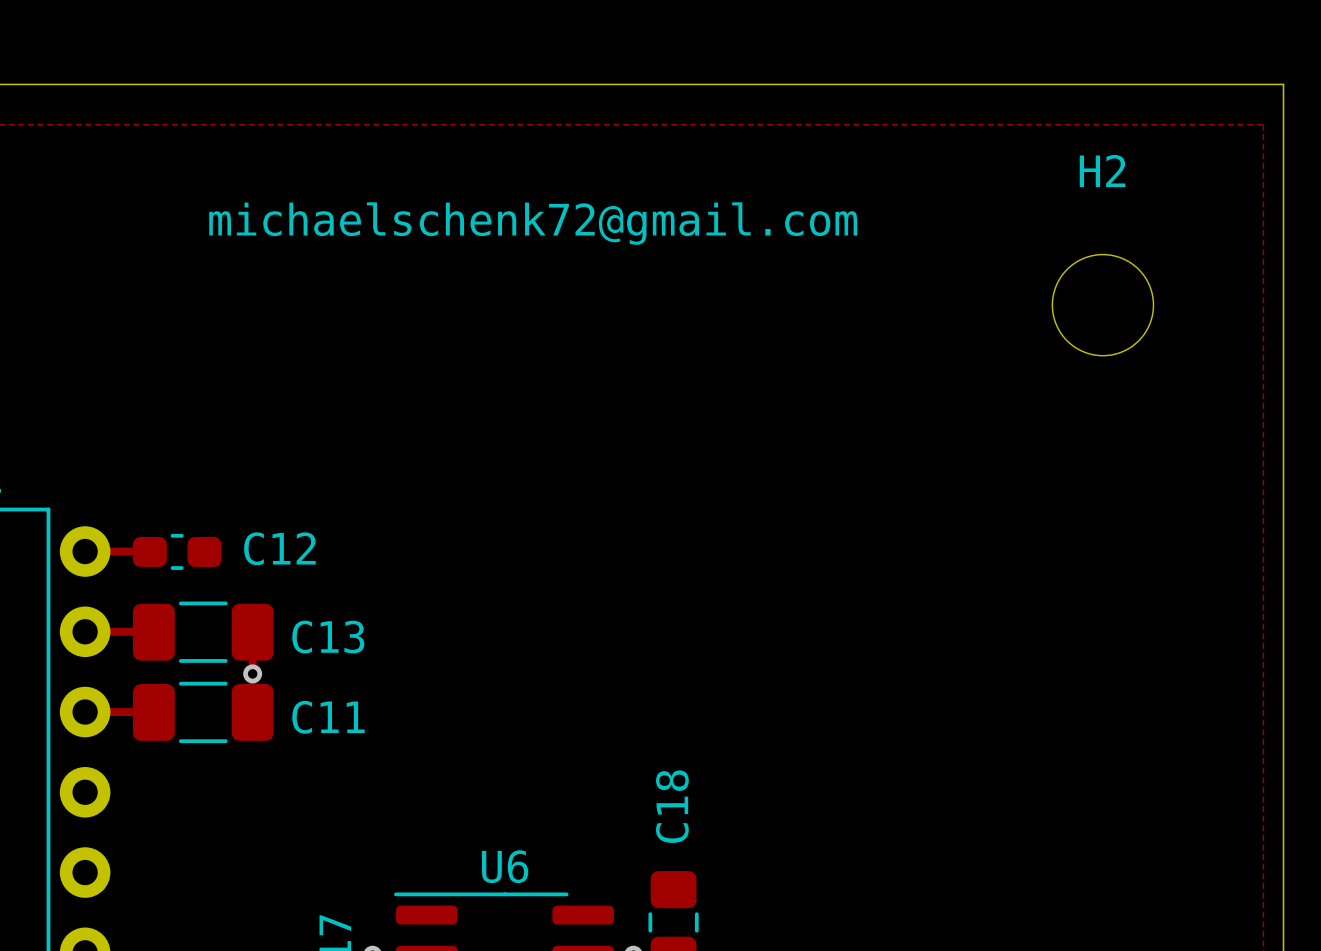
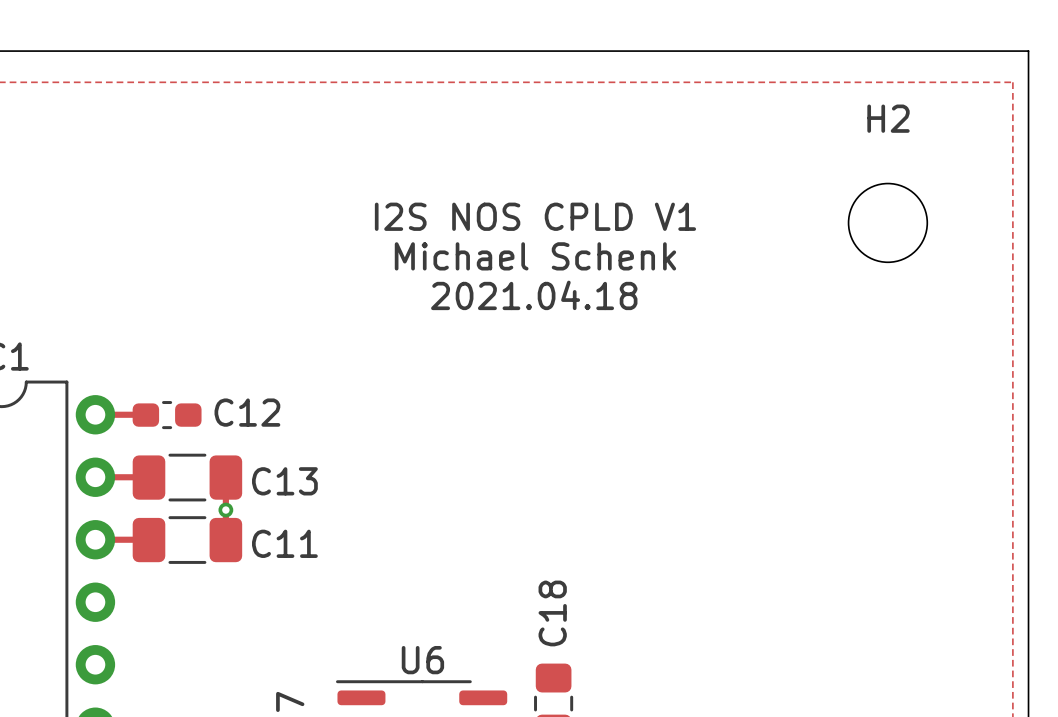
text: michaelschenk72@gmail.com (533, 223) -> none
text: none -> I2S NOS CPLD V1 (535, 216)
text: none -> Michael Schenk (535, 256)
text: none -> 2021.04.18 (534, 295)

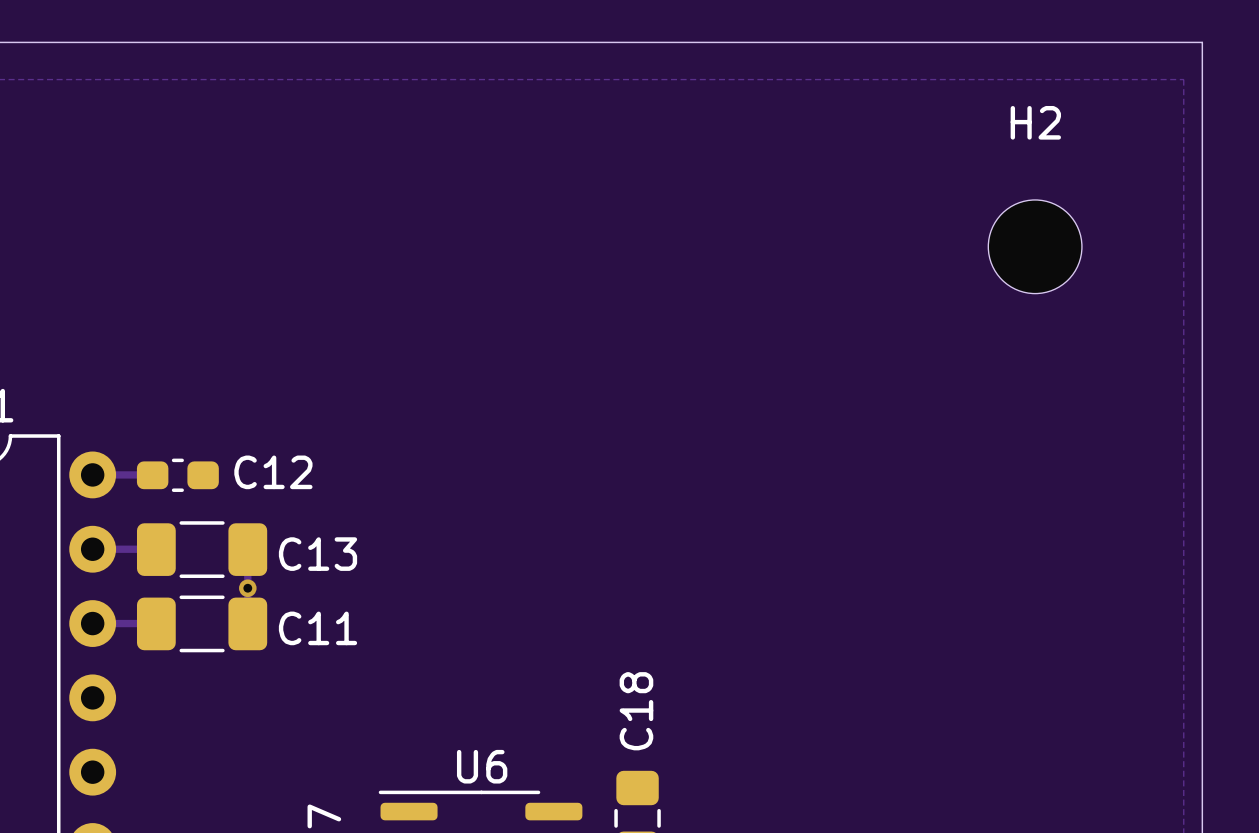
text: I2S NOS CPLD V1 (535, 216) -> none
text: Michael Schenk (535, 256) -> none
text: 2021.04.18 (534, 295) -> none

